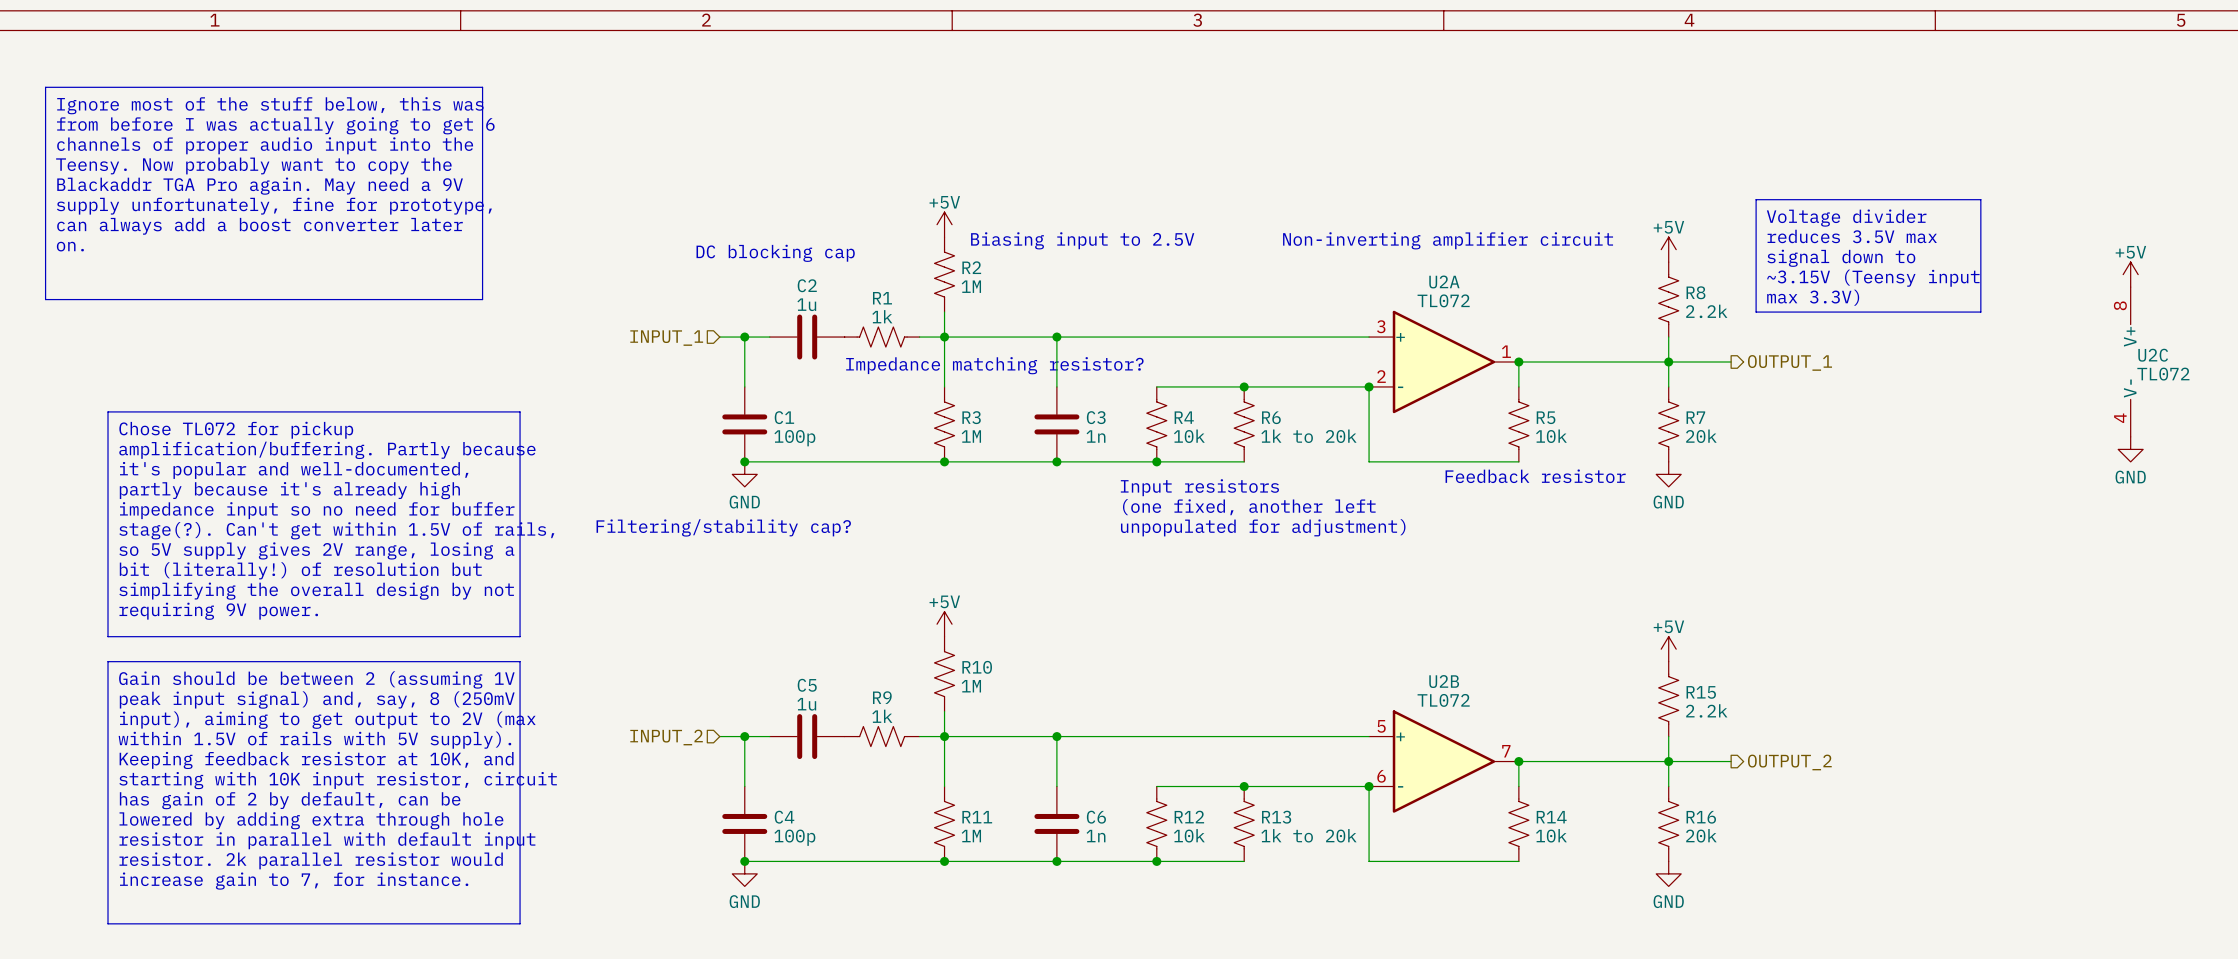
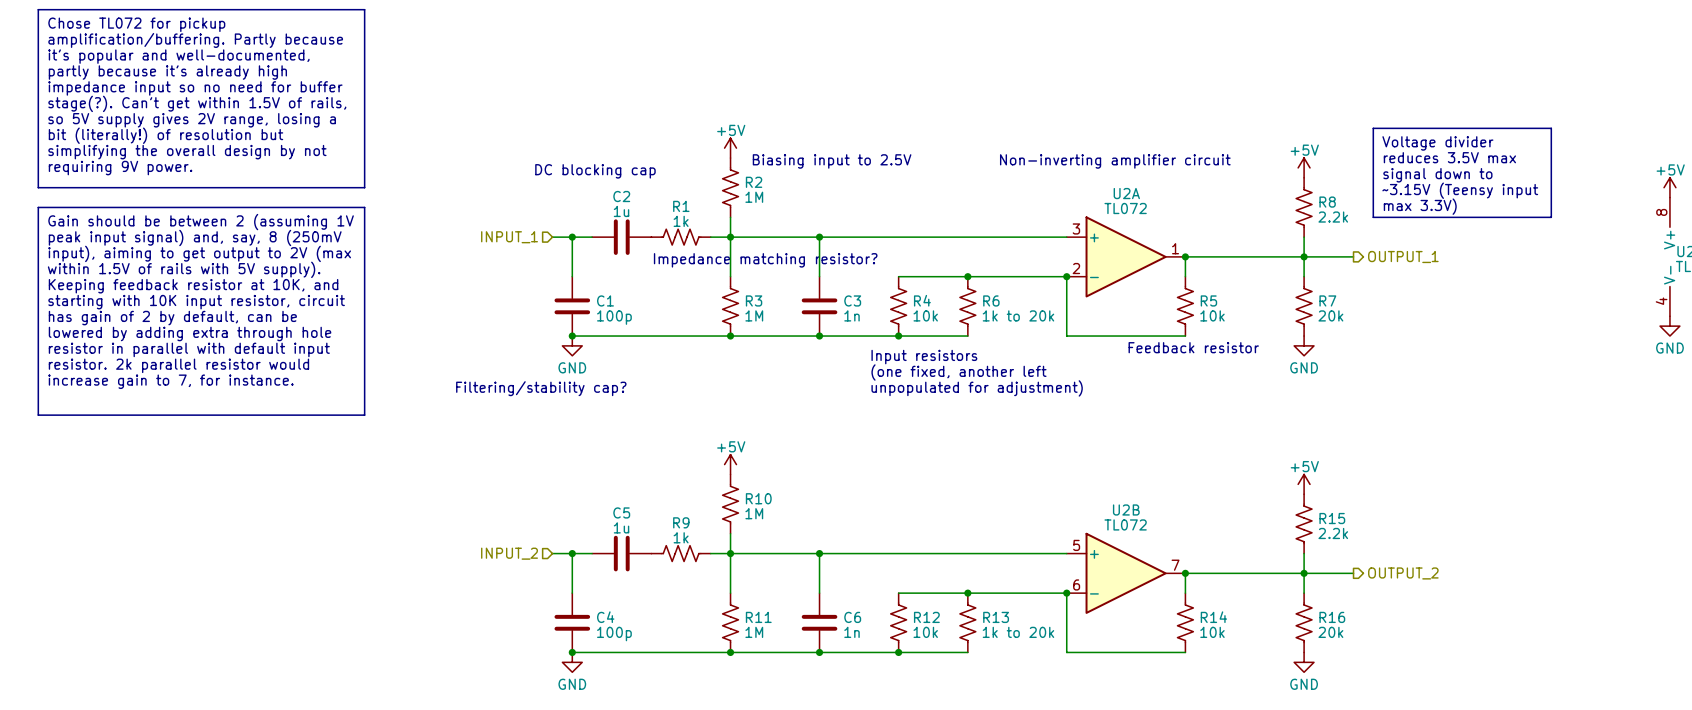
text: none -> Chose TL072 for pickup (136, 24)
line: (482, 87) (45, 87) (45, 299) (70, 299) -> (364, 207) (364, 415) (38, 415) (38, 207)
text: none -> amplification/buffering. Partly because (195, 40)
text: Ignore most of the stuff below, this was (270, 105) -> none
text: none -> it's popular and well-documented, (178, 56)
text: from before I was actually going to get 6 (275, 125) -> none
text: none -> partly because it's already high (167, 72)
text: channels of proper audio input into the (265, 145) -> none
text: none -> impedance input so no need for buffer (195, 88)
text: Teensy. Now probably want to copy the (253, 165) -> none
text: none -> stage(?). Can't get within 1.5V of rails, (197, 103)
text: Blackaddr TGA Pro again. May need a 9V (260, 186) -> none
text: none -> so 5V supply gives 2V range, losing a (192, 120)
text: supply unfortunately, fine for prototype, (274, 206) -> none
text: none -> bit (literally!) of resolution but (166, 135)
text: can always add a boost converter later (260, 226) -> none
text: none -> simplifying the overall design by not (187, 152)
text: on. (70, 246) -> none
text: none -> requiring 9V power. (120, 168)
line: (482, 274) (482, 299) -> (364, 187) (38, 187) (38, 9) (364, 9) (364, 39)
text: none -> Gain should be between 2 (assuming 1V (201, 222)
text: none -> peak input signal) and, say, 8 (250mV (195, 237)
text: none -> input), aiming to get output to 2V (max (199, 253)
text: none -> within 1.5V of rails with 5V supply). (184, 269)
text: none -> Keeping feedback resistor at 10K, and (193, 286)
line: (108, 411) (520, 411) (520, 636) (108, 636) (108, 411) -> none
text: none -> starting with 10K input resistor, circuit (196, 302)
text: Chose TL072 for pickup (236, 430) -> none
text: none -> has gain of 2 by default, can be (172, 318)
text: amplification/buffering. Partly because (327, 450) -> none
text: none -> lowered by adding extra through hole (190, 333)
text: it's popular and well-documented, (294, 470) -> none
text: none -> resistor in parallel with default input (189, 349)
text: partly because it's already high (289, 490) -> none
text: none -> resistor. 2k parallel resistor would (178, 365)
text: impedance input so no need for buffer (317, 510) -> none
text: none -> increase gain to 7, for instance. (170, 381)
text: stage(?). Can't get within 1.5V of rails, (336, 530) -> none
text: so 5V supply gives 2V range, losing a (316, 550) -> none
text: bit (literally!) of resolution but (300, 570) -> none
text: simplifying the overall design by not (316, 591) -> none
text: requiring 9V power. (218, 611) -> none
line: (108, 661) (108, 923) (520, 923) (520, 661) (108, 661) -> none
text: Gain should be between 2 (assuming 1V (316, 679) -> none
text: peak input signal) and, say, 8 (250mV (317, 700) -> none
text: input), aiming to get output to 2V (max (327, 720) -> none
text: within 1.5V of rails with 5V supply). (314, 740) -> none
text: Keeping feedback resistor at 10K, and (316, 760) -> none
text: starting with 10K input resistor, circuit (338, 780) -> none
text: has gain of 2 by default, can be (290, 800) -> none
text: lowered by adding extra through hole (311, 820) -> none
text: resistor in parallel with default input (327, 840) -> none
text: resistor. 2k parallel resistor would (311, 860) -> none
text: increase gain to 7, for instance. (294, 881) -> none

